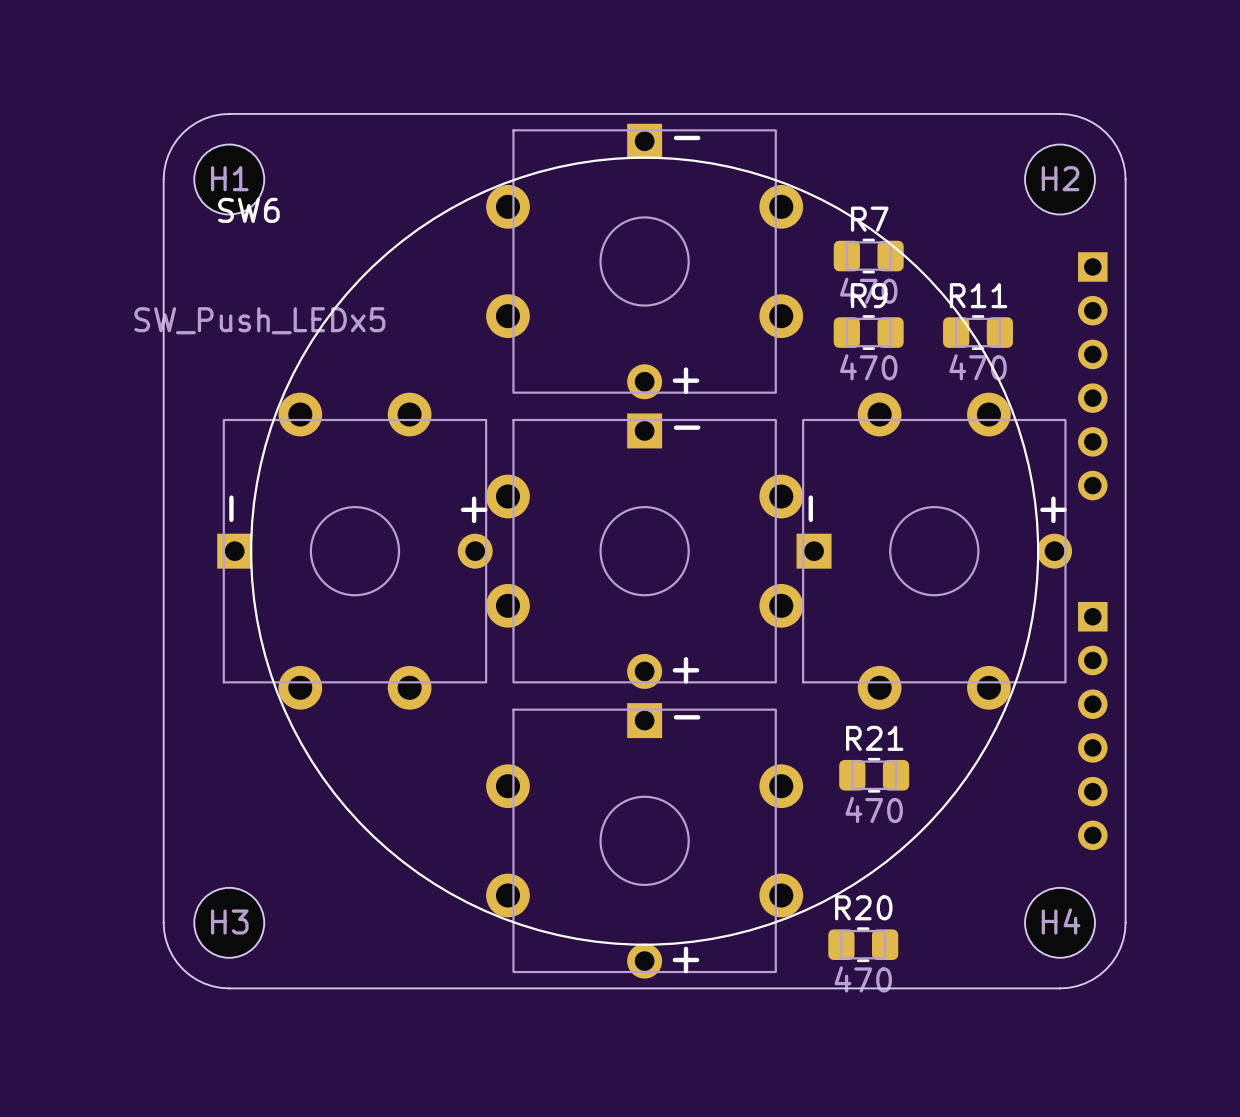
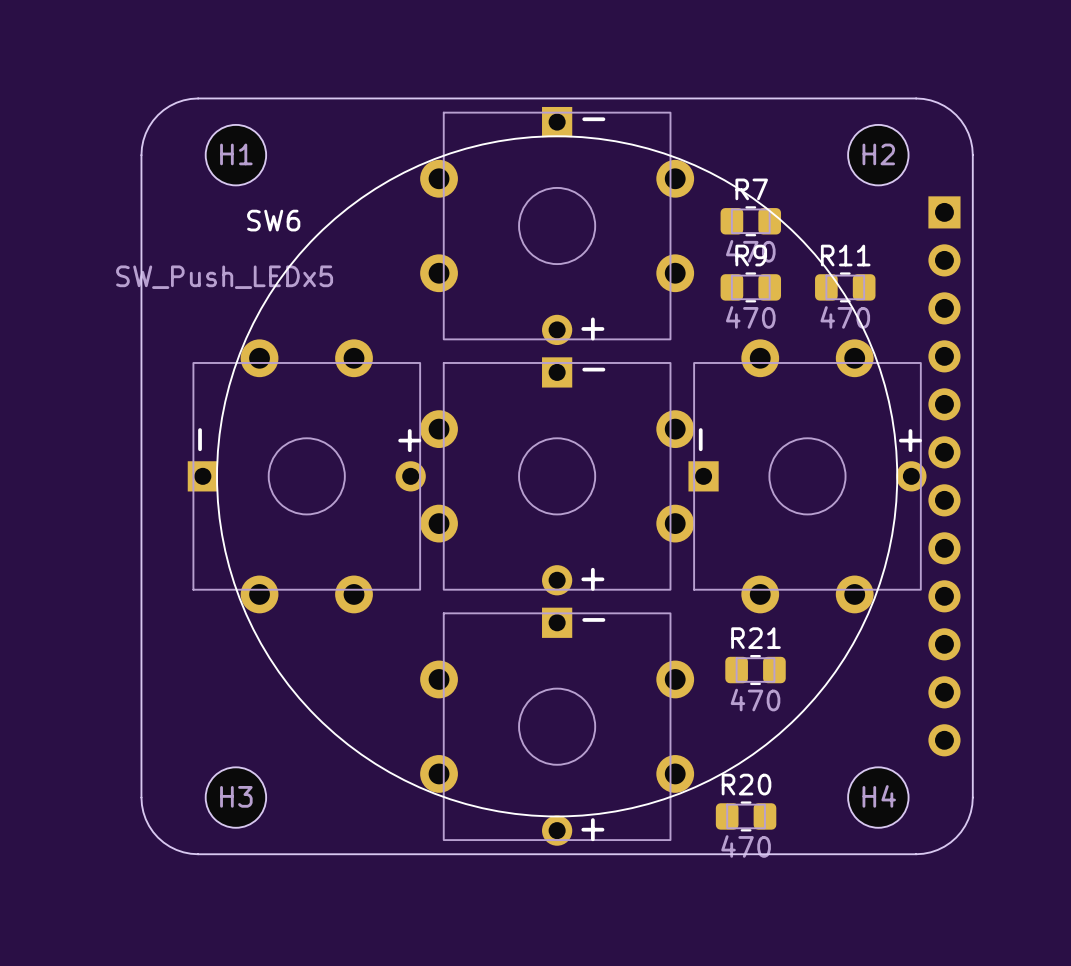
H1 position: (229, 179) -> (235, 155)
H2 position: (1060, 179) -> (878, 155)
SW6 name position: SW6 (248, 210) -> SW6 (273, 220)
part: (1092, 376) -> none
part: none -> (944, 476)
part: (1092, 726) -> none
H3 position: (229, 922) -> (235, 797)
H4 position: (1060, 922) -> (878, 797)

